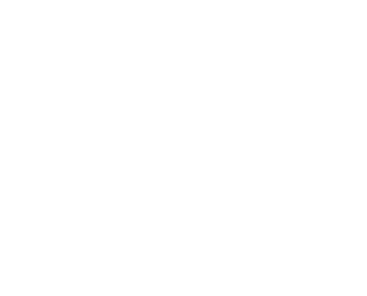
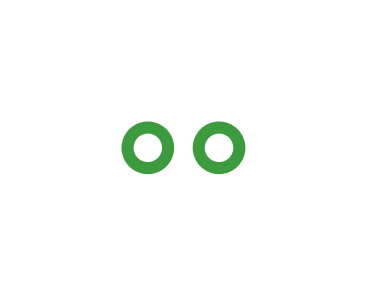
part: none -> (183, 147)

